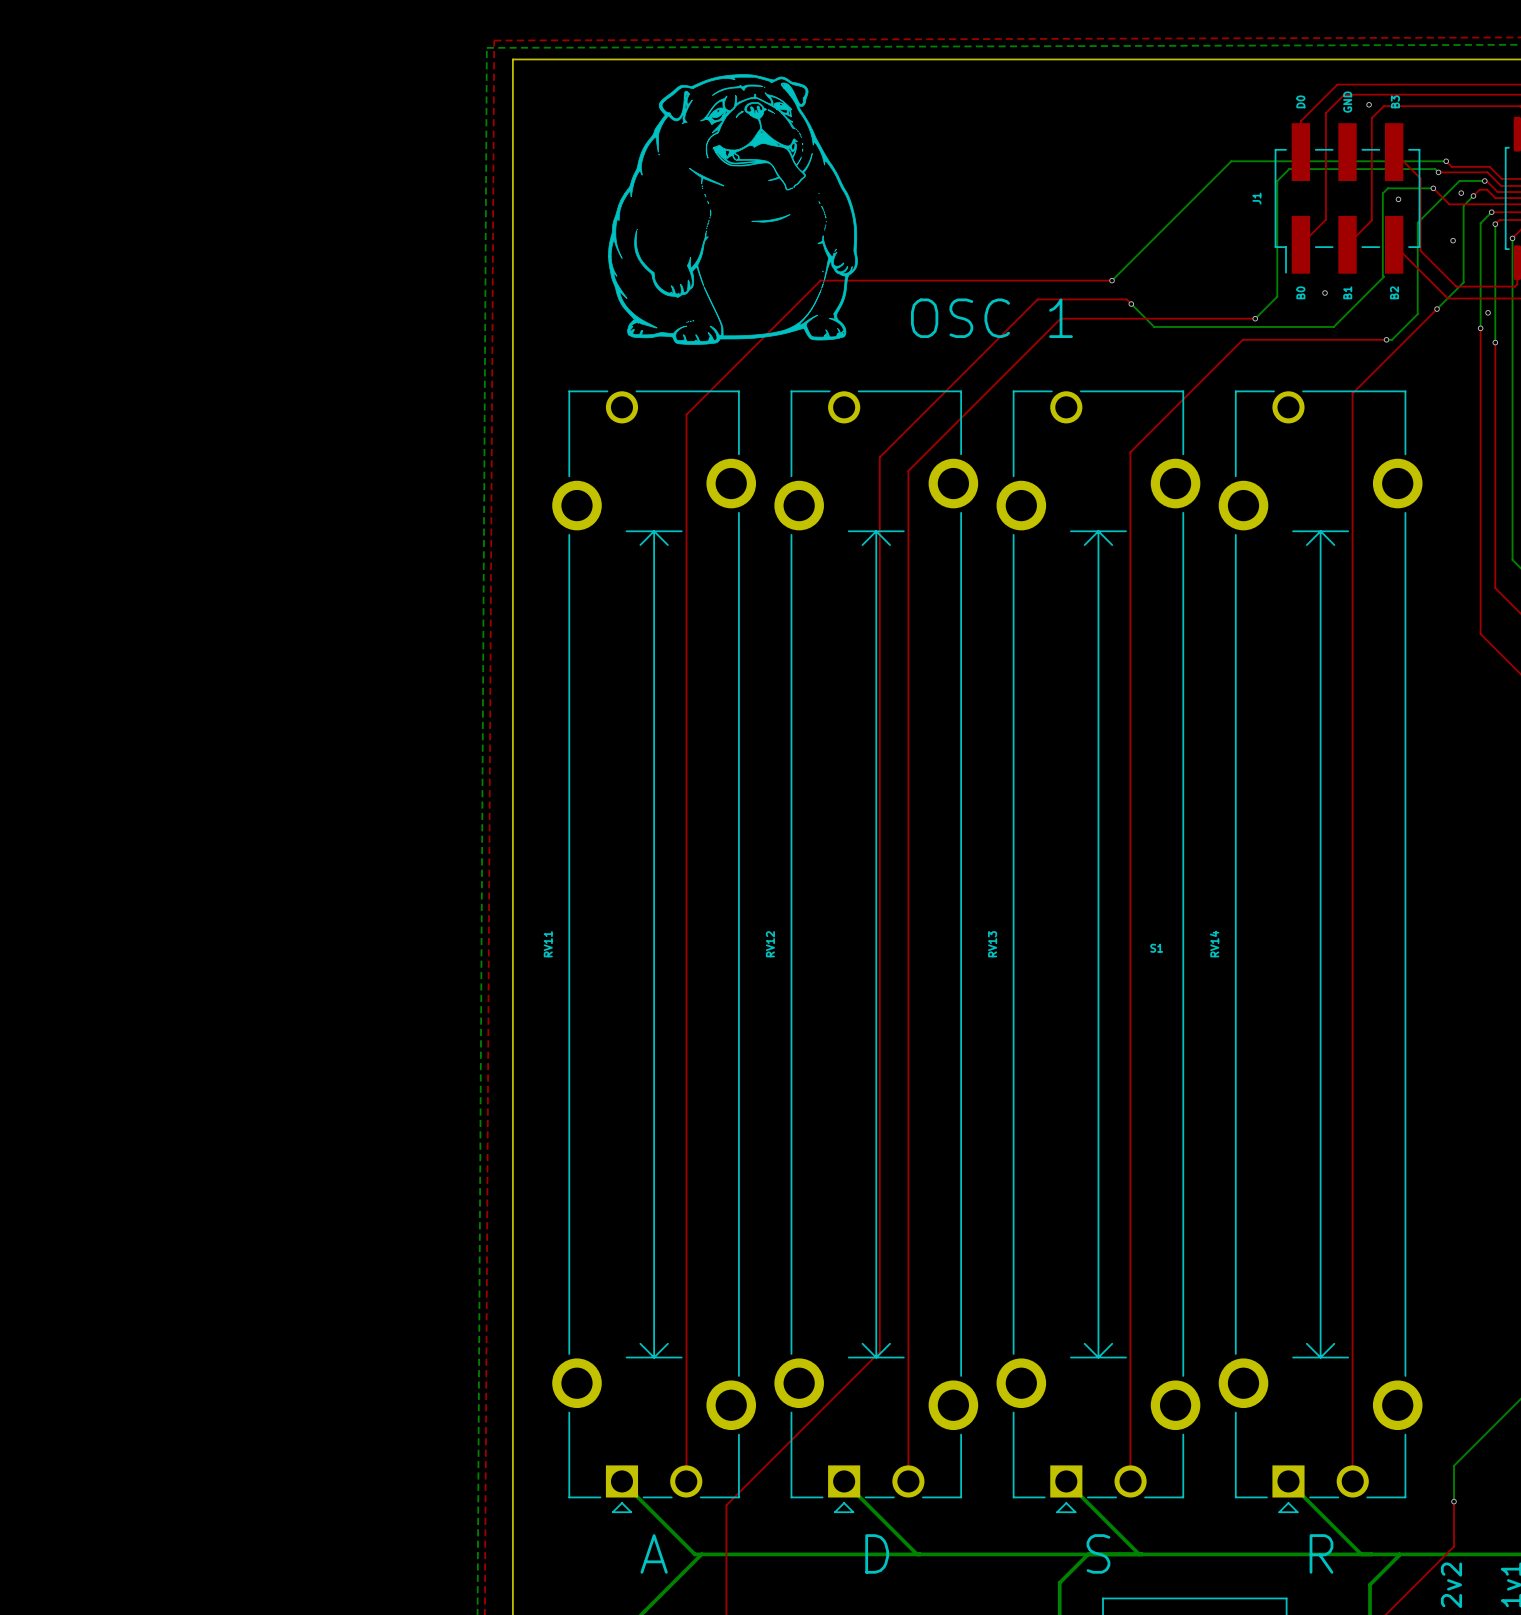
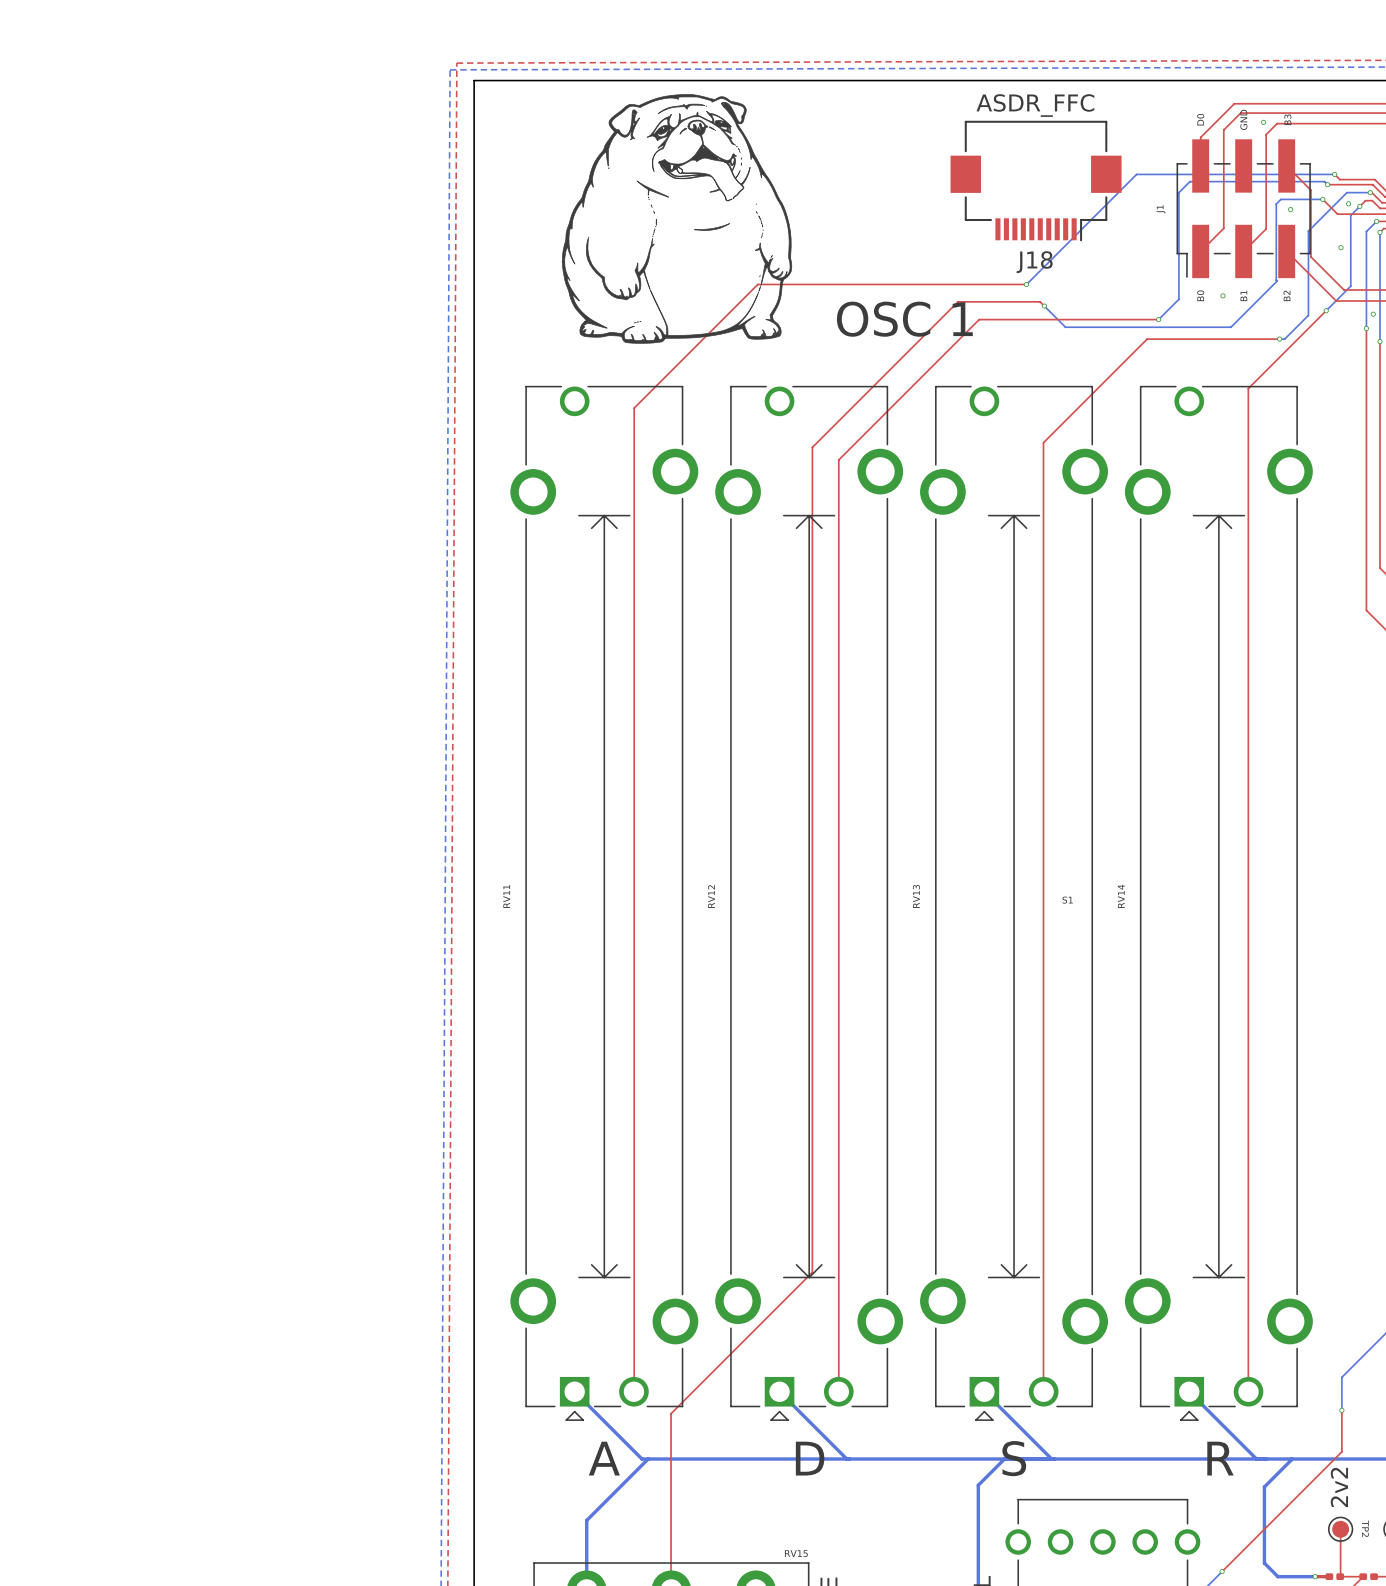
text: none -> ASDR_FFC (1035, 105)
J18: none -> (1036, 181)

